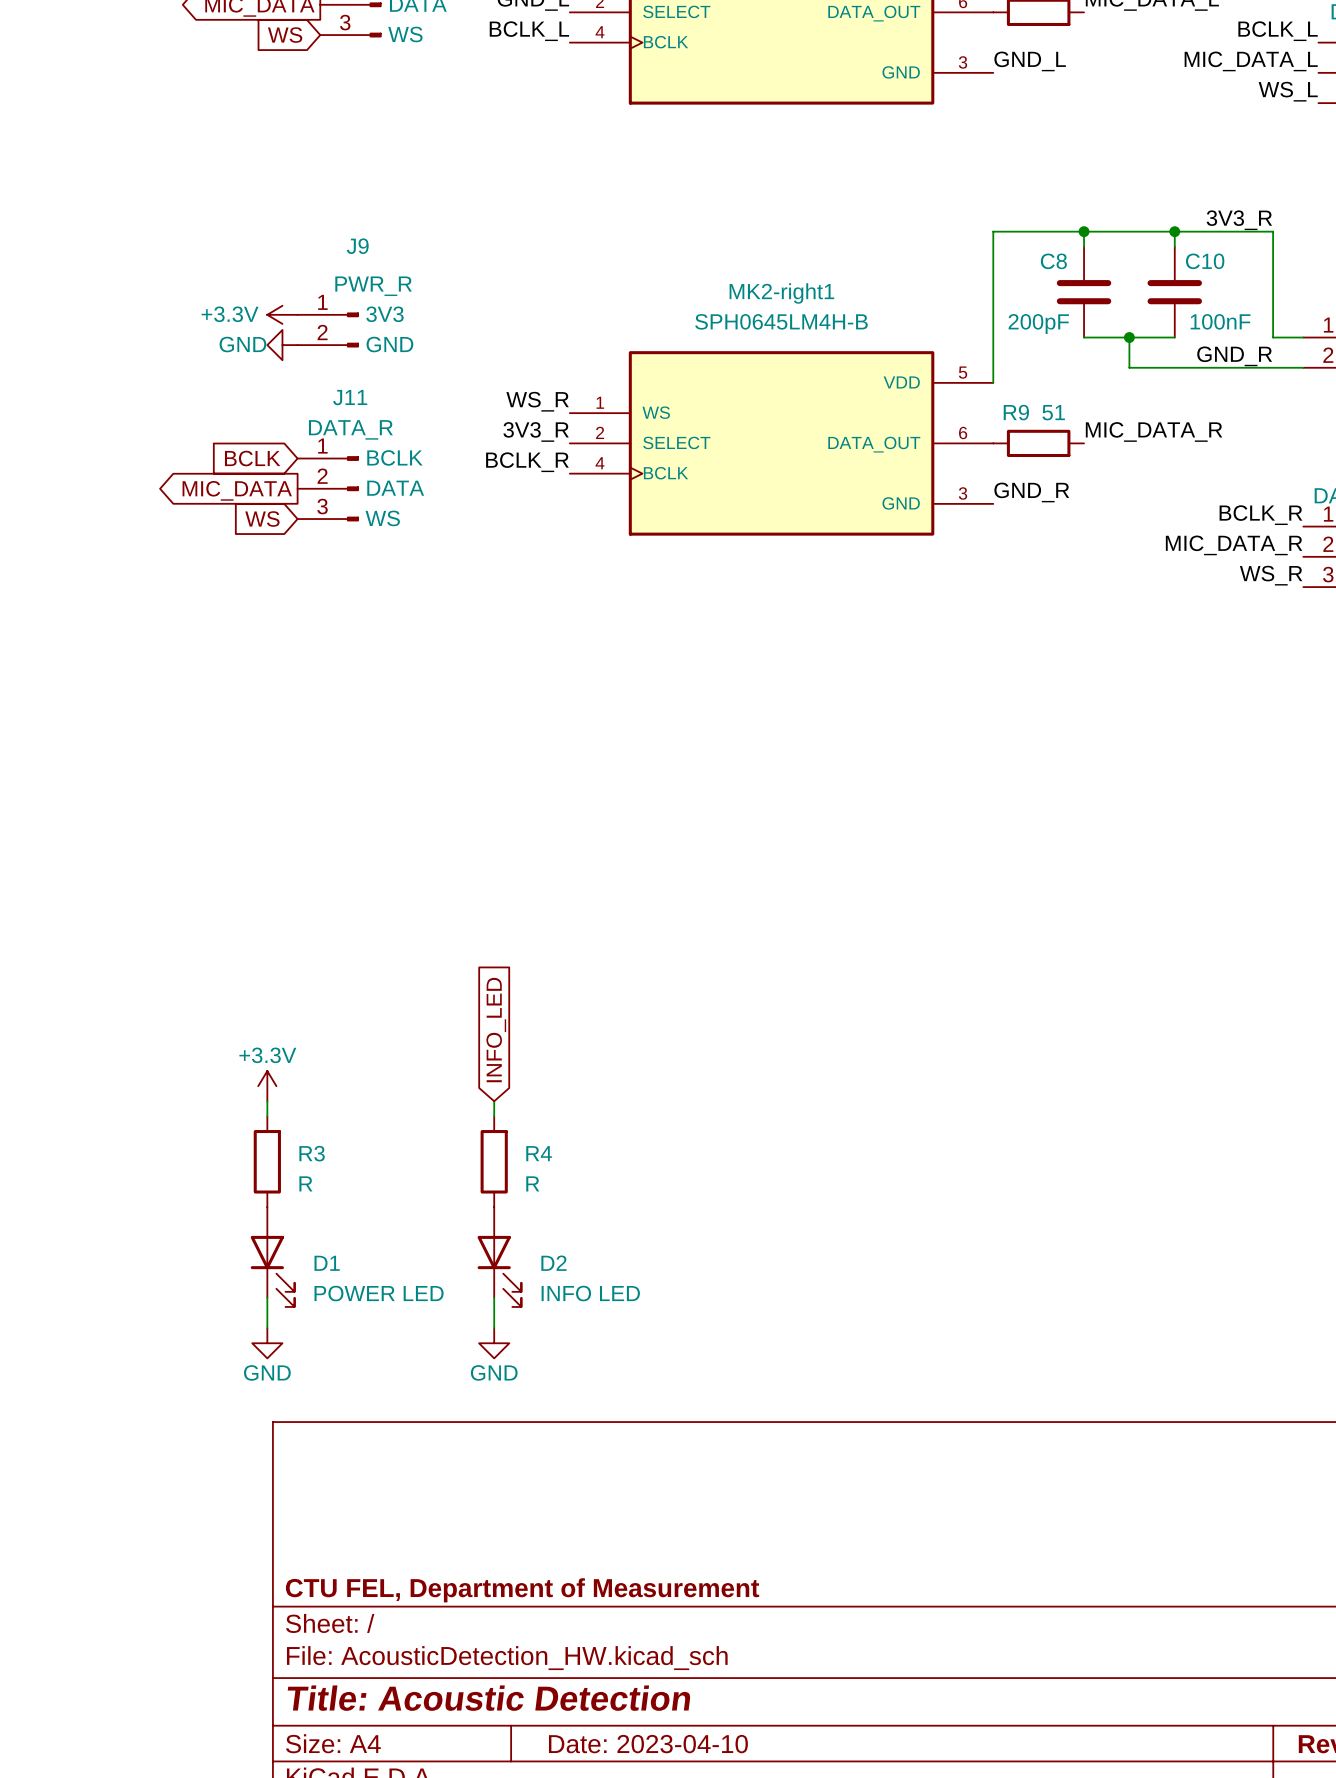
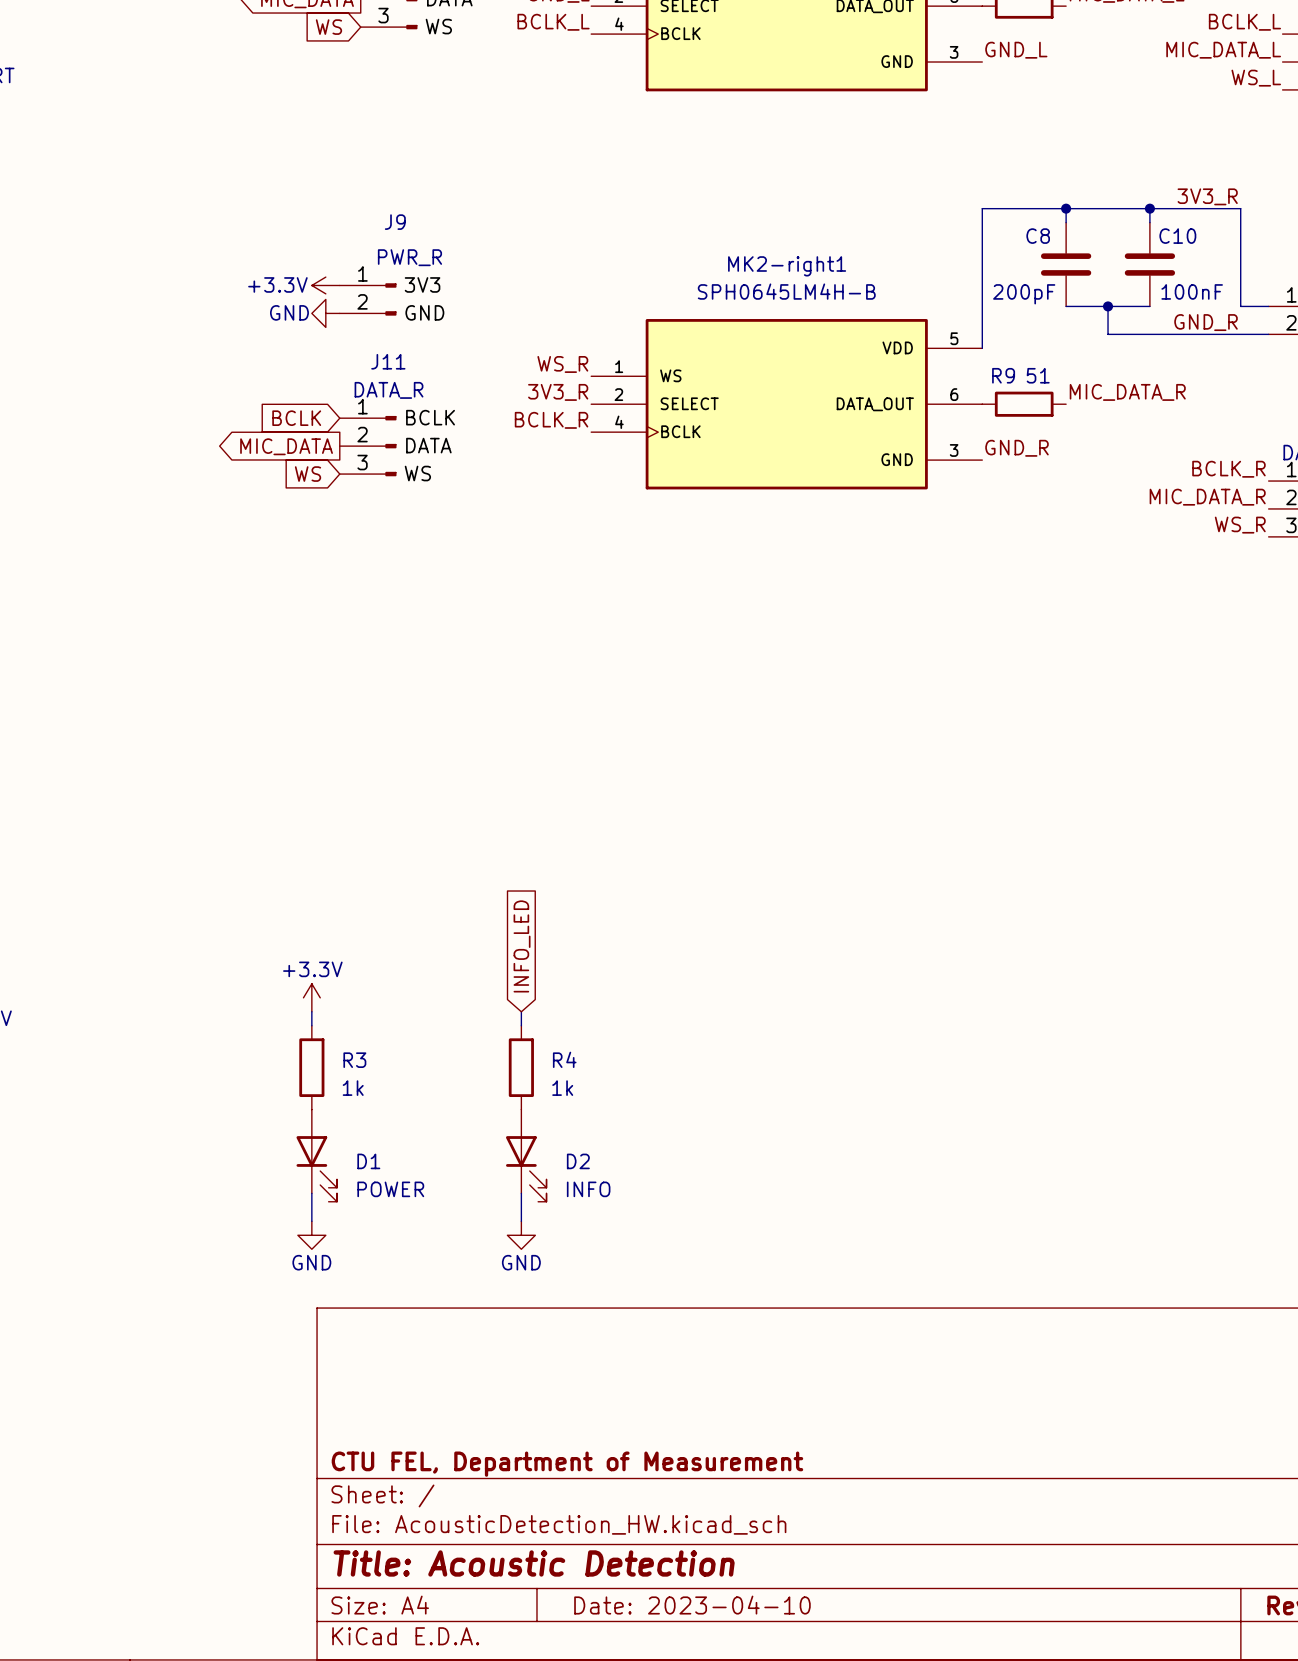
R3 value: R (305, 1183) -> 1k (353, 1088)
R4 value: R (532, 1183) -> 1k (562, 1088)
D1 value: POWER LED (379, 1293) -> POWER (390, 1189)
D2 value: INFO LED (590, 1293) -> INFO (588, 1189)

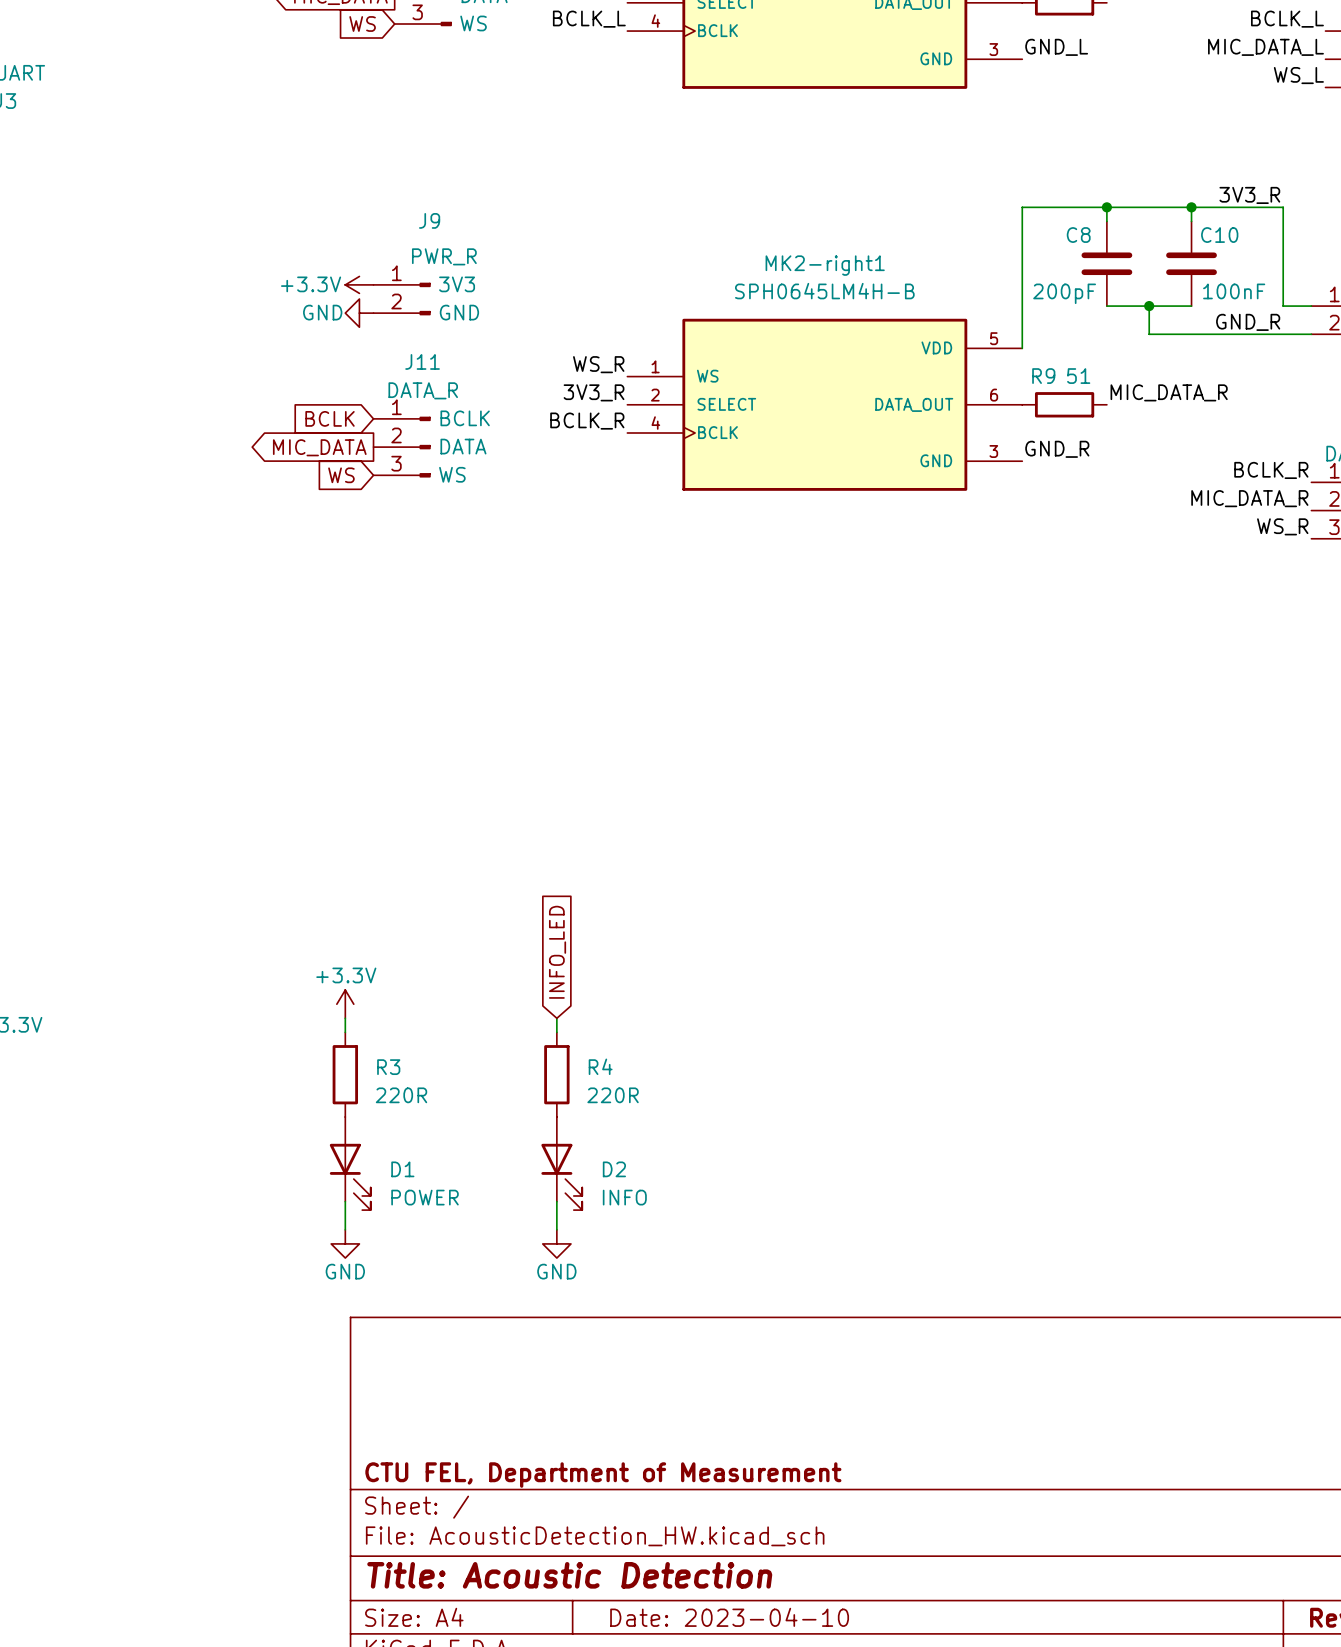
R3 value: 1k (353, 1088) -> 220R (401, 1095)
R4 value: 1k (562, 1088) -> 220R (613, 1095)

